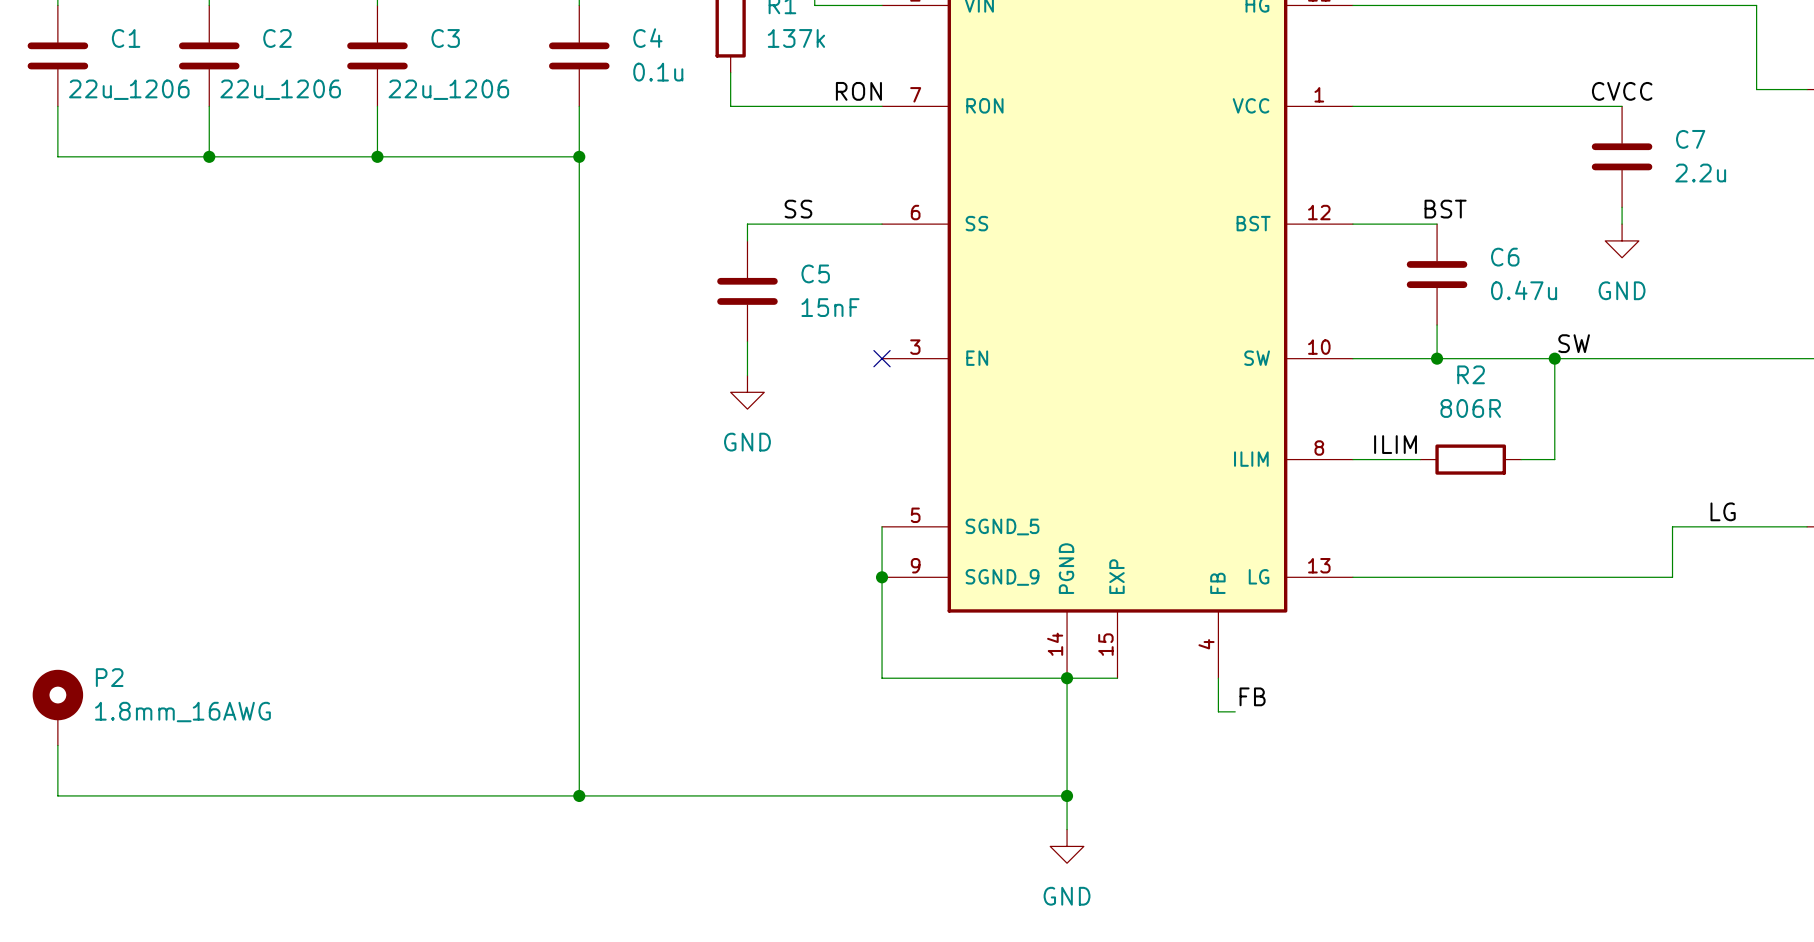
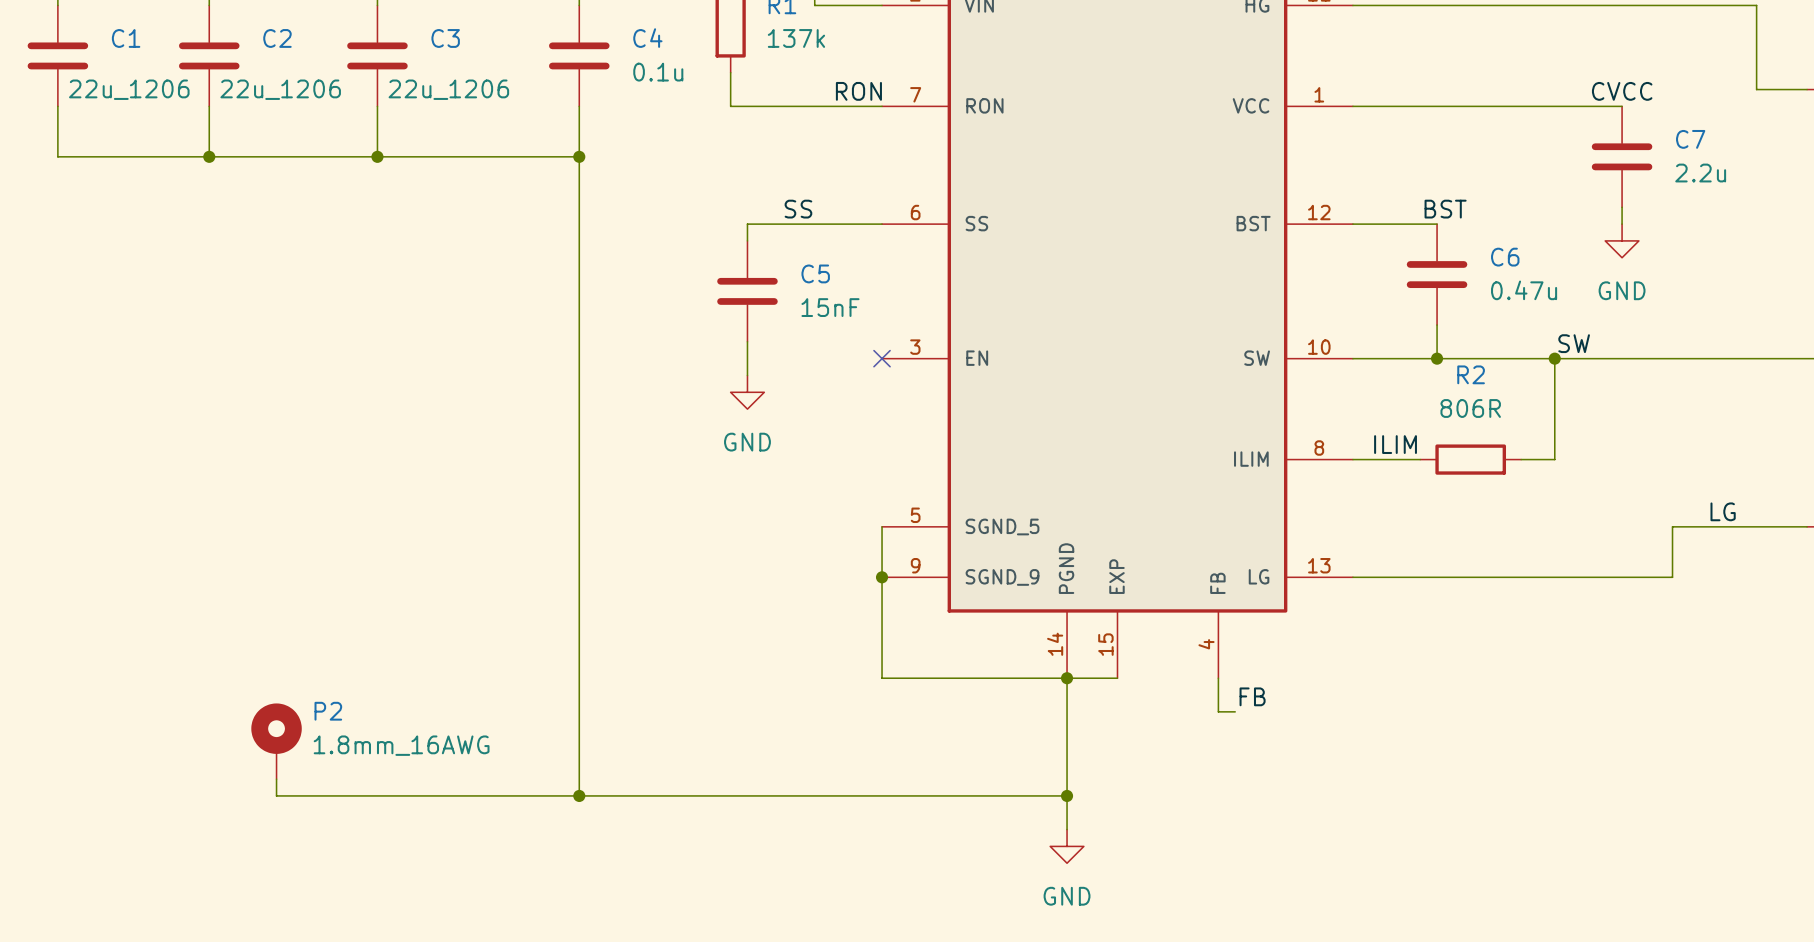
P2 position: (57, 707) -> (276, 741)
wire: (57, 745) (57, 795) (276, 795) -> (276, 779) (276, 795)

